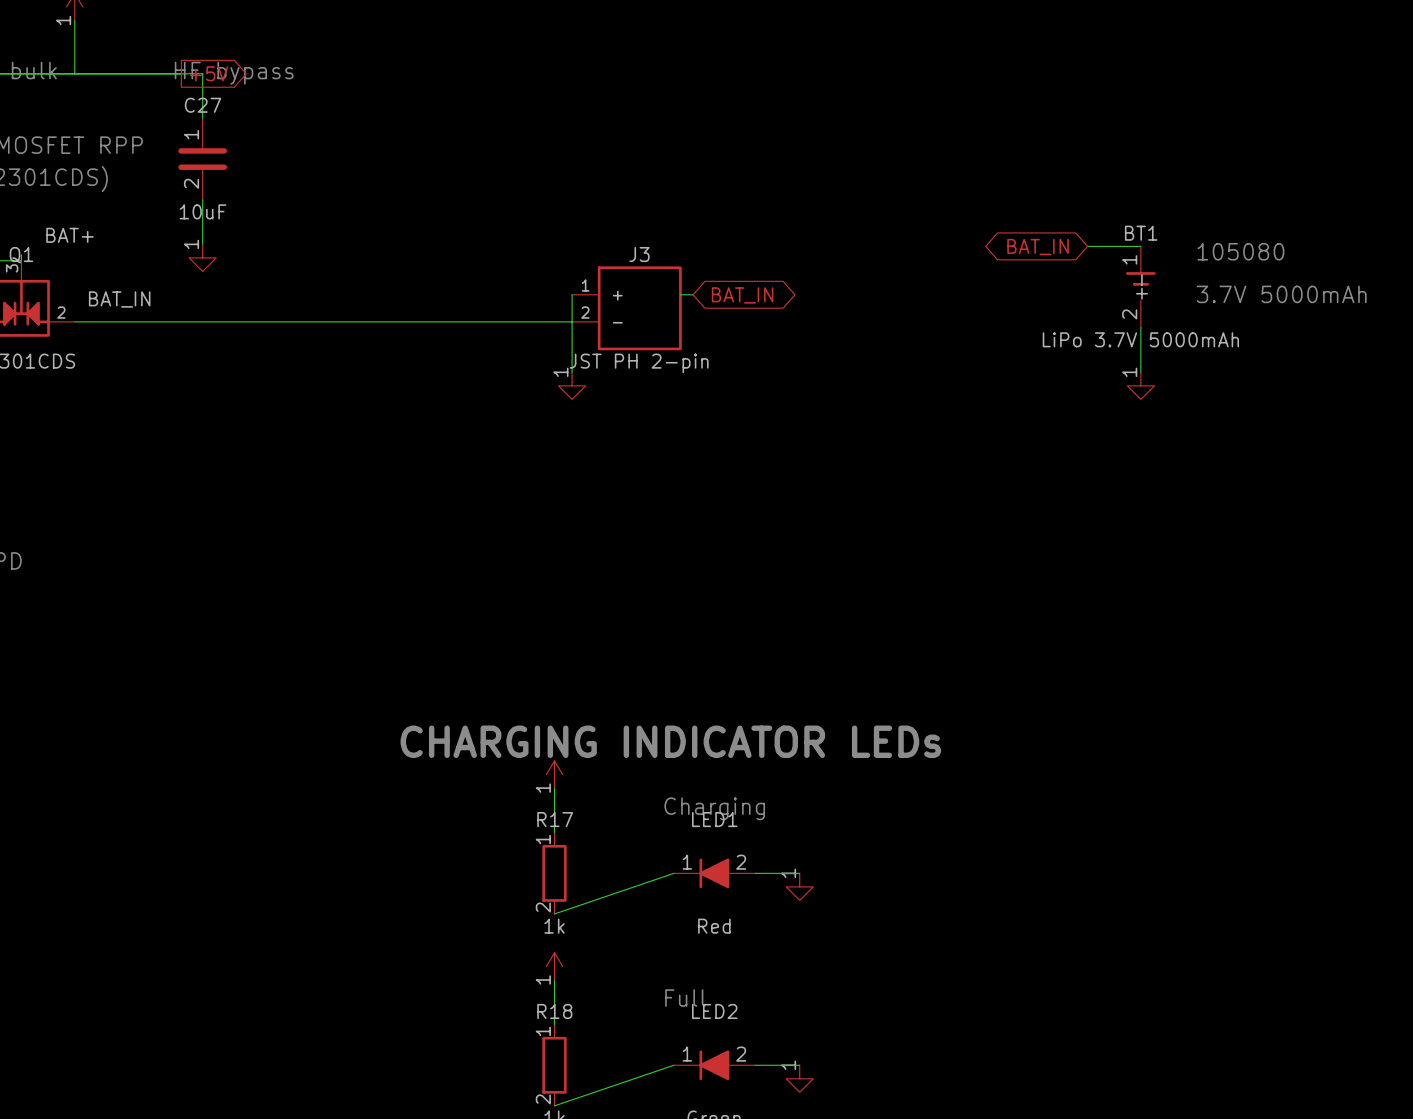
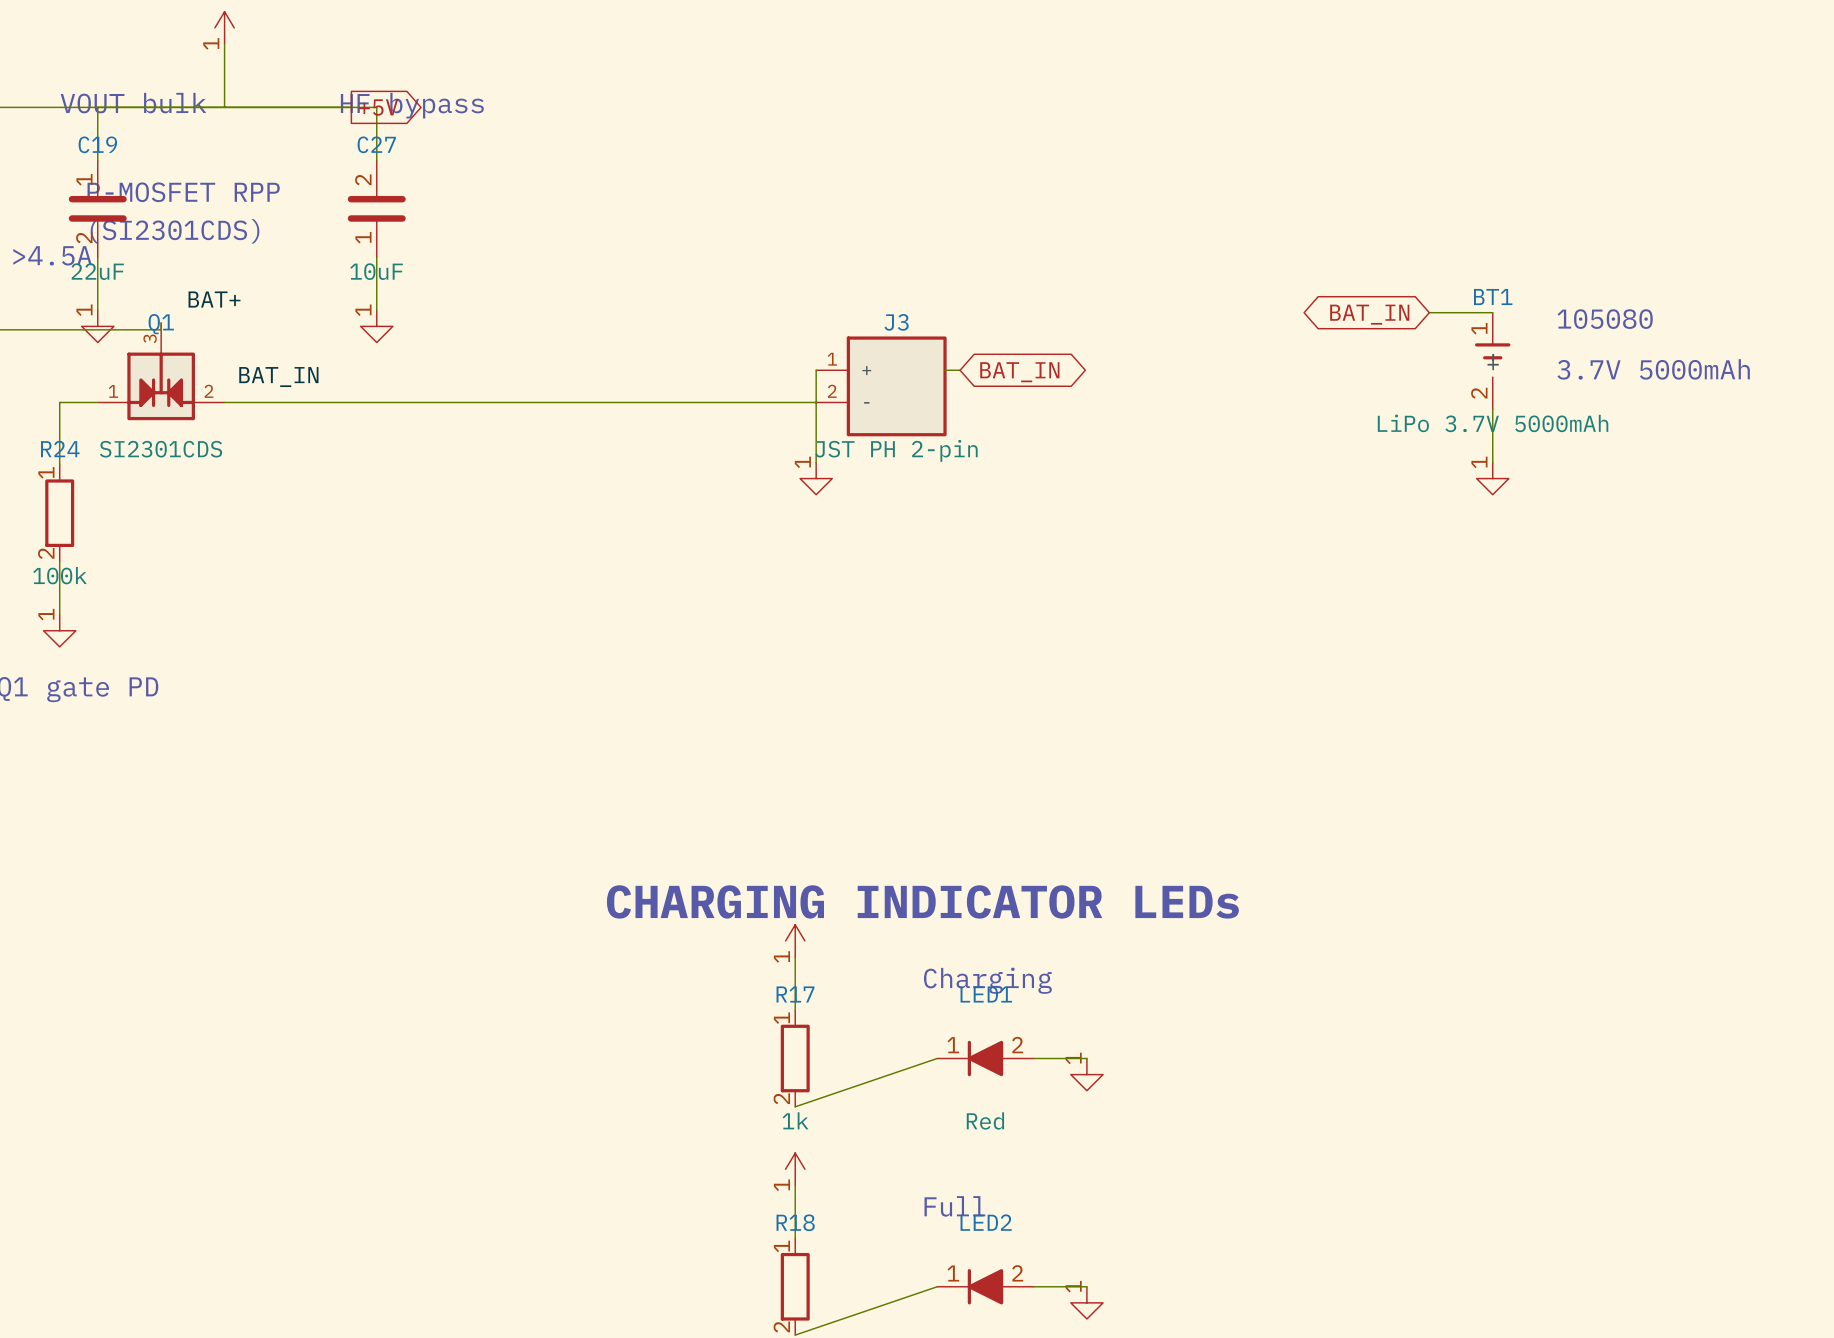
C27 rotation: 0° (202, 159) -> 180° (376, 208)

